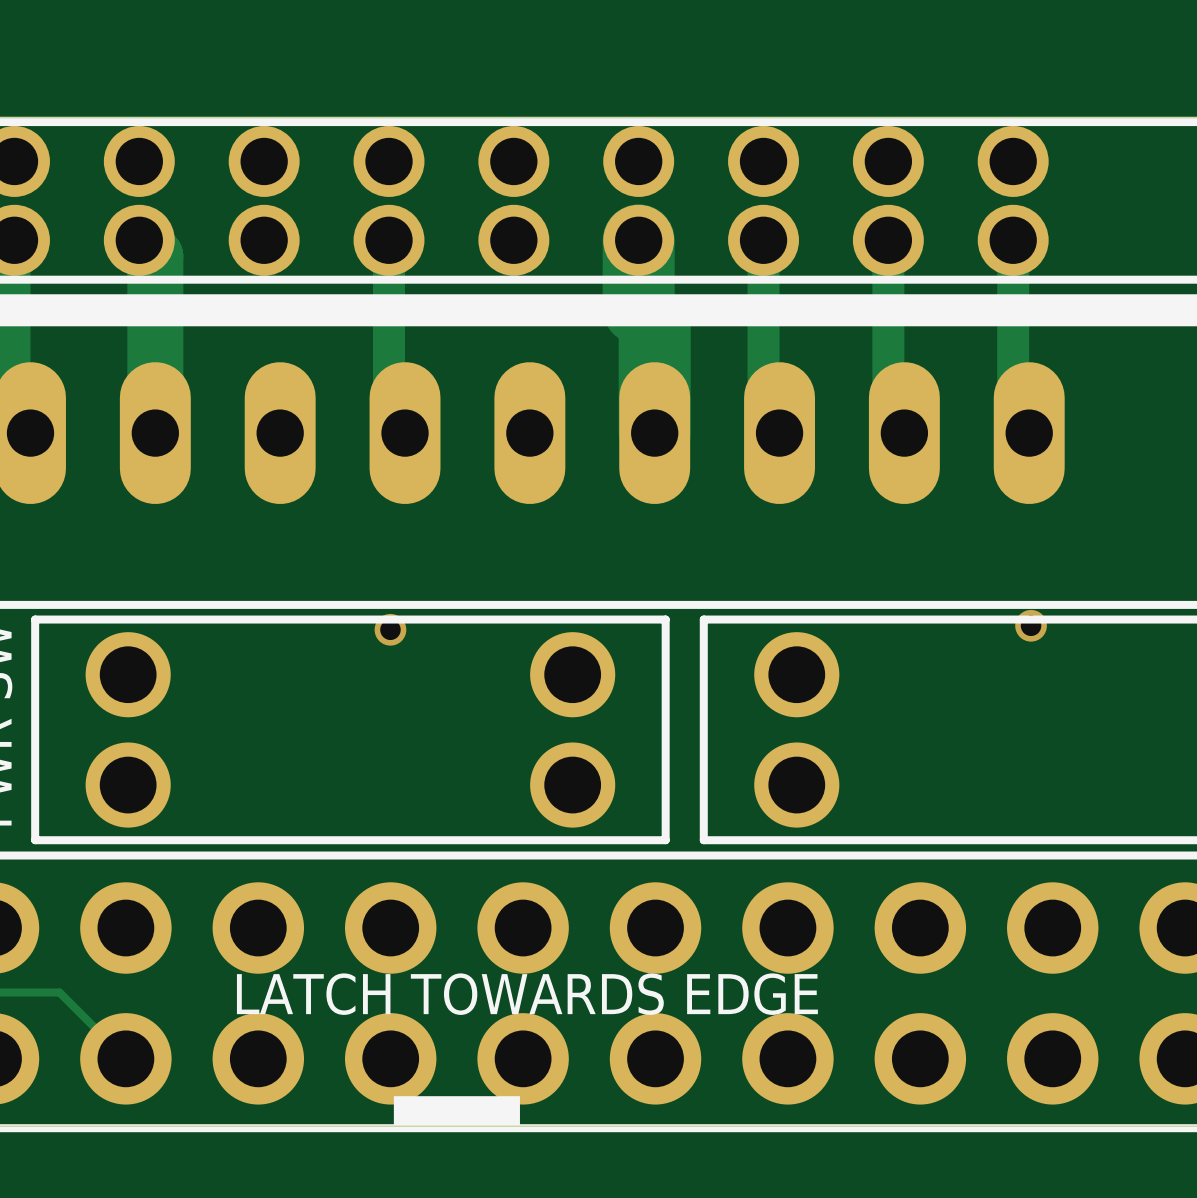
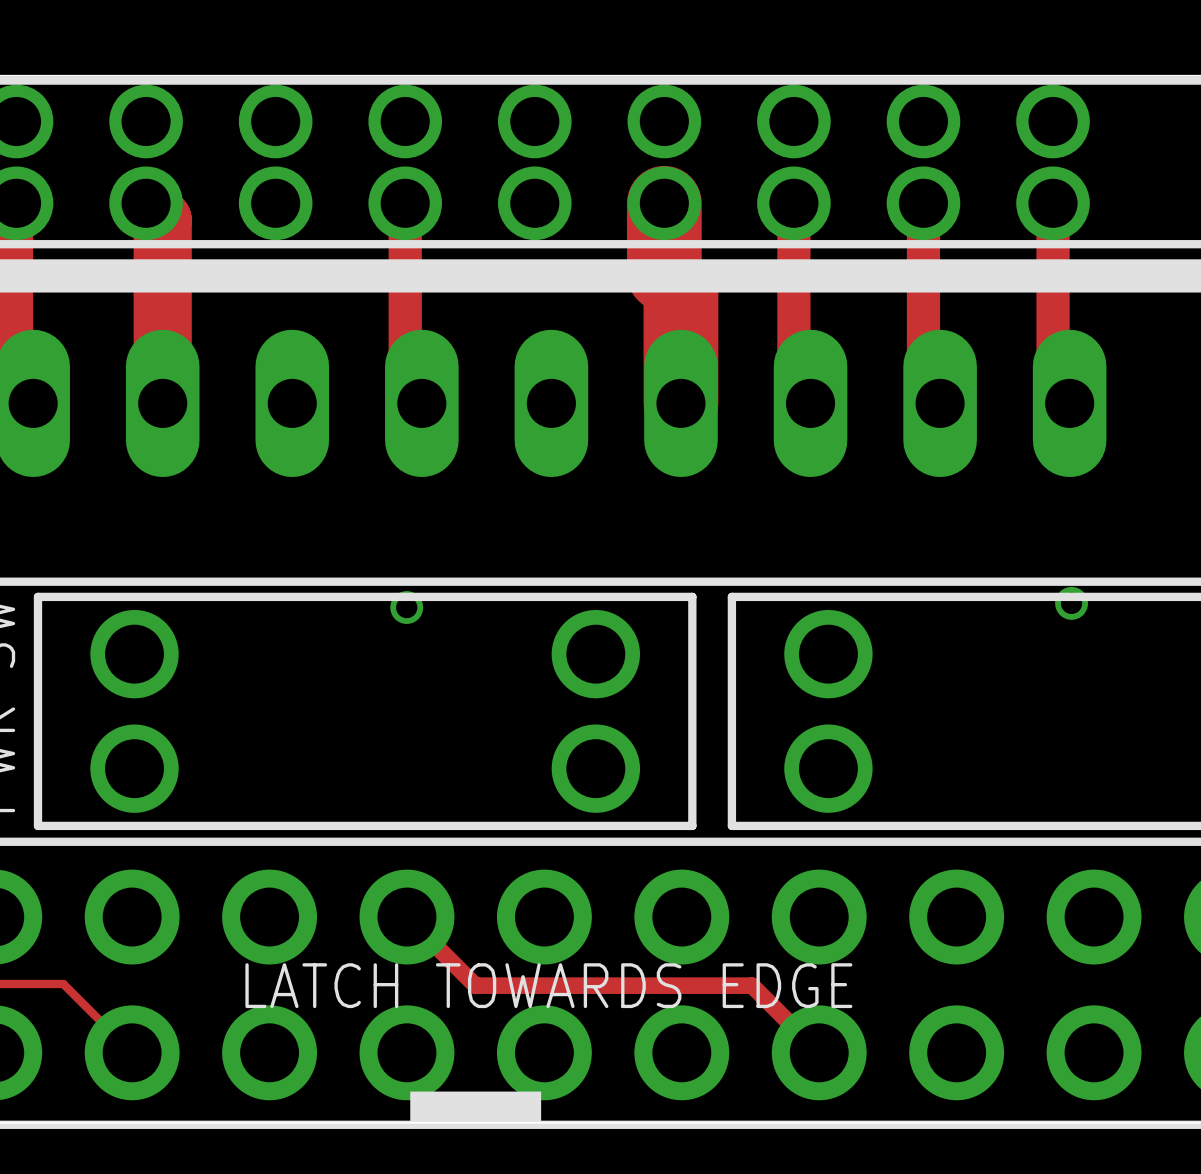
track: none -> (406, 917) (475, 985) (752, 985) (819, 1052)

